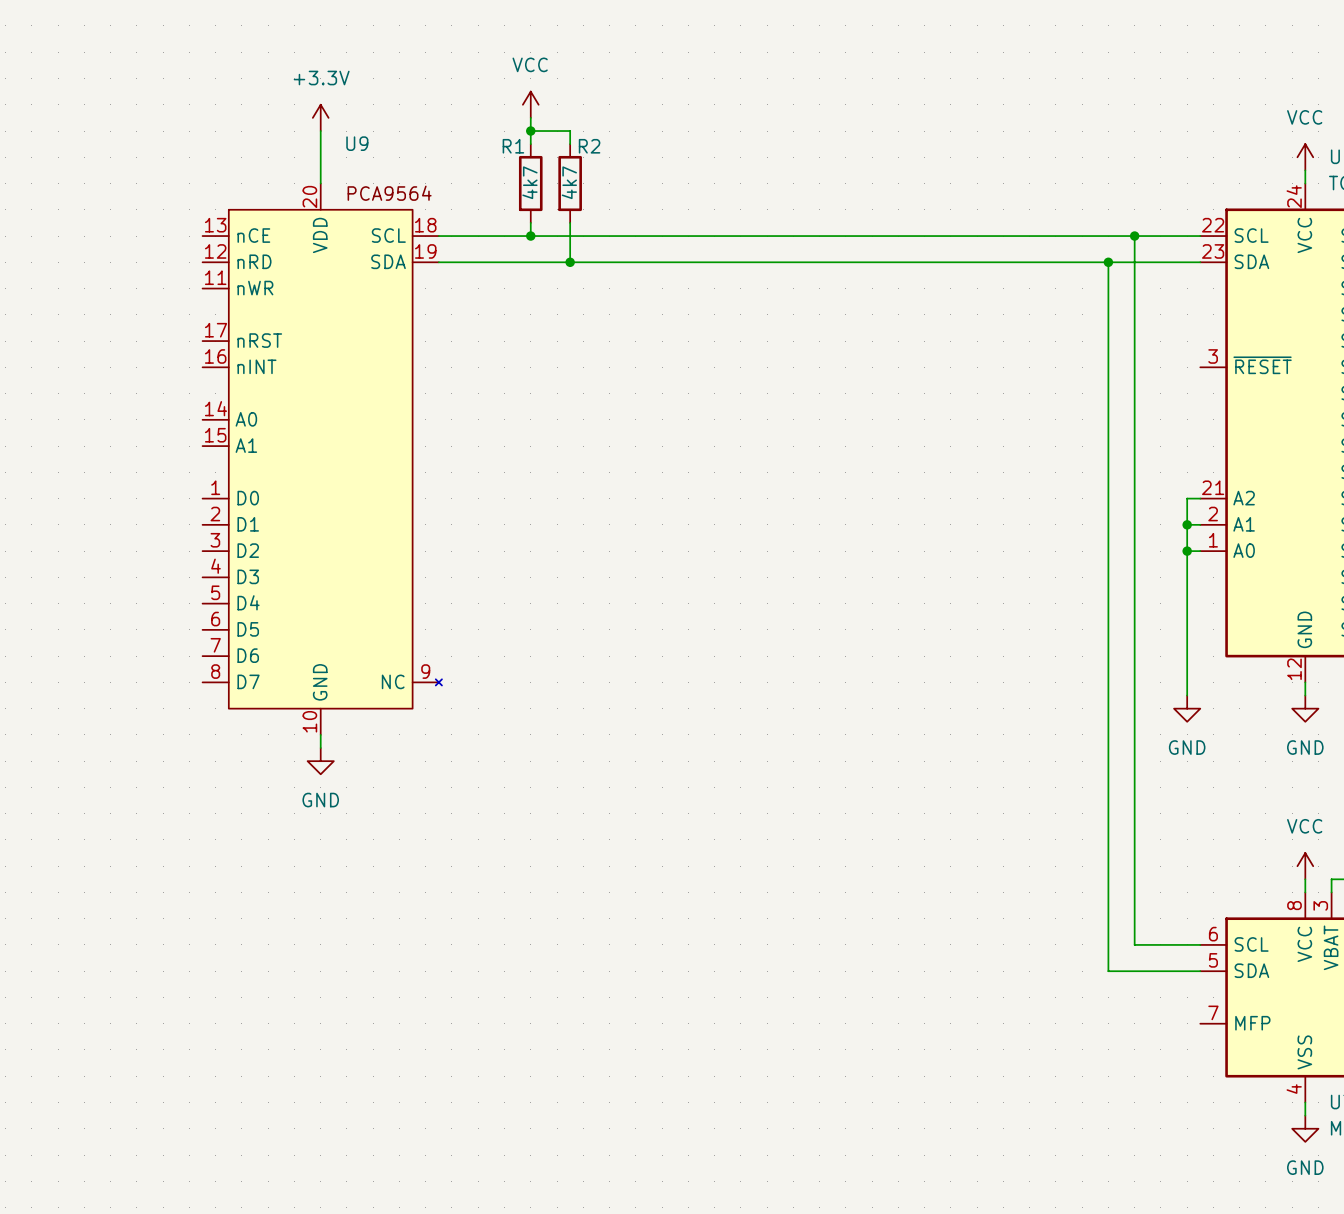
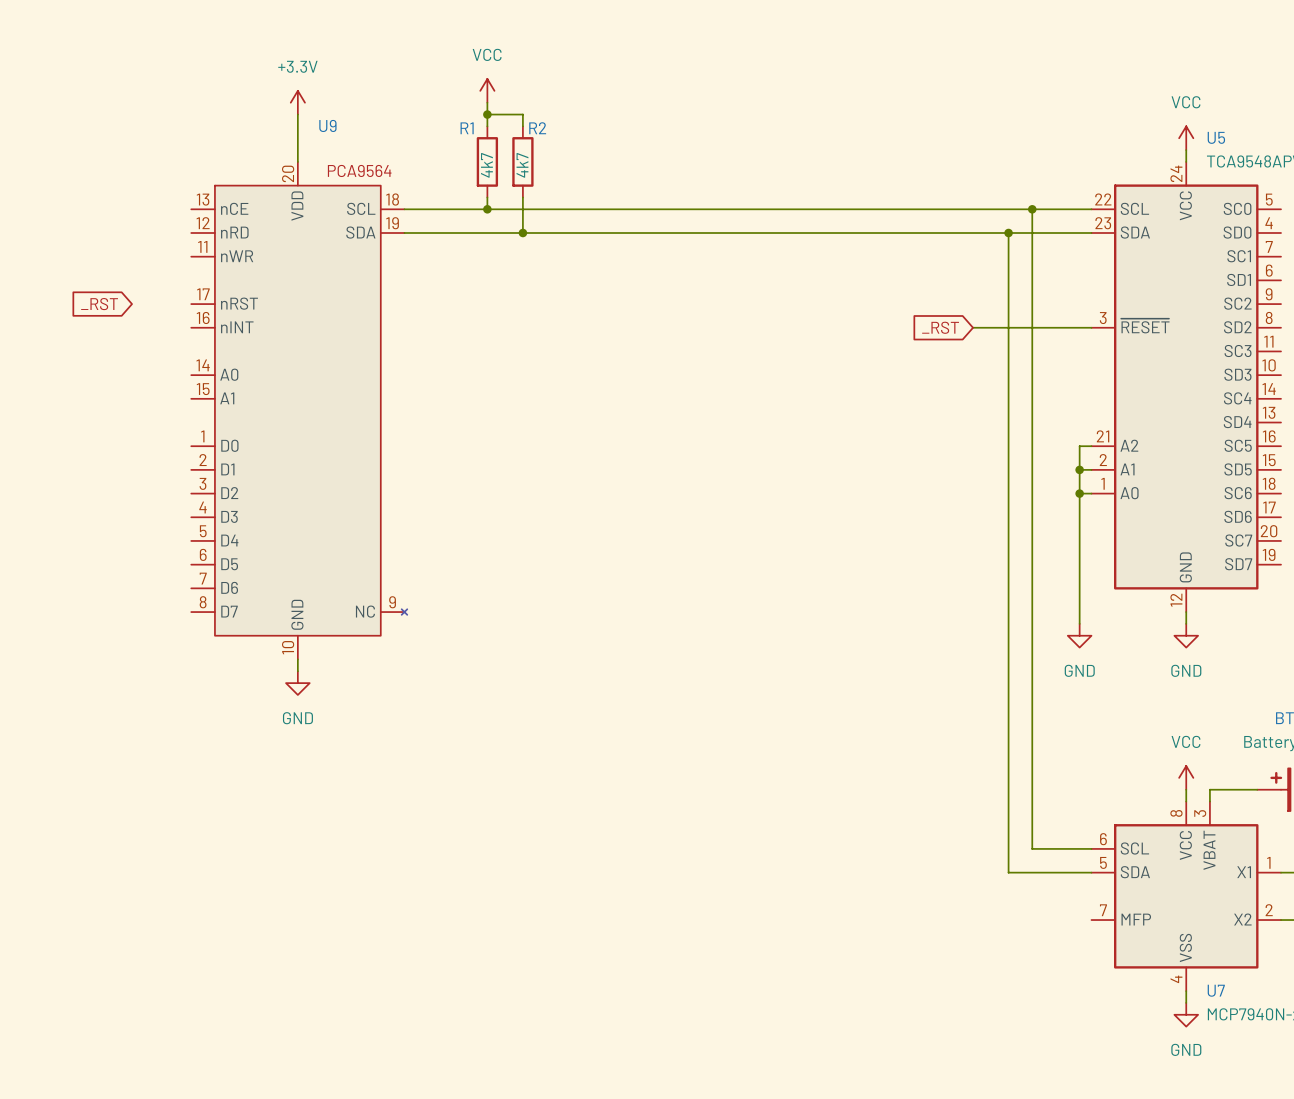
global label: none -> _RST (99, 304)
global label: none -> _RST (940, 327)
wire: none -> (973, 327) (1091, 327)

